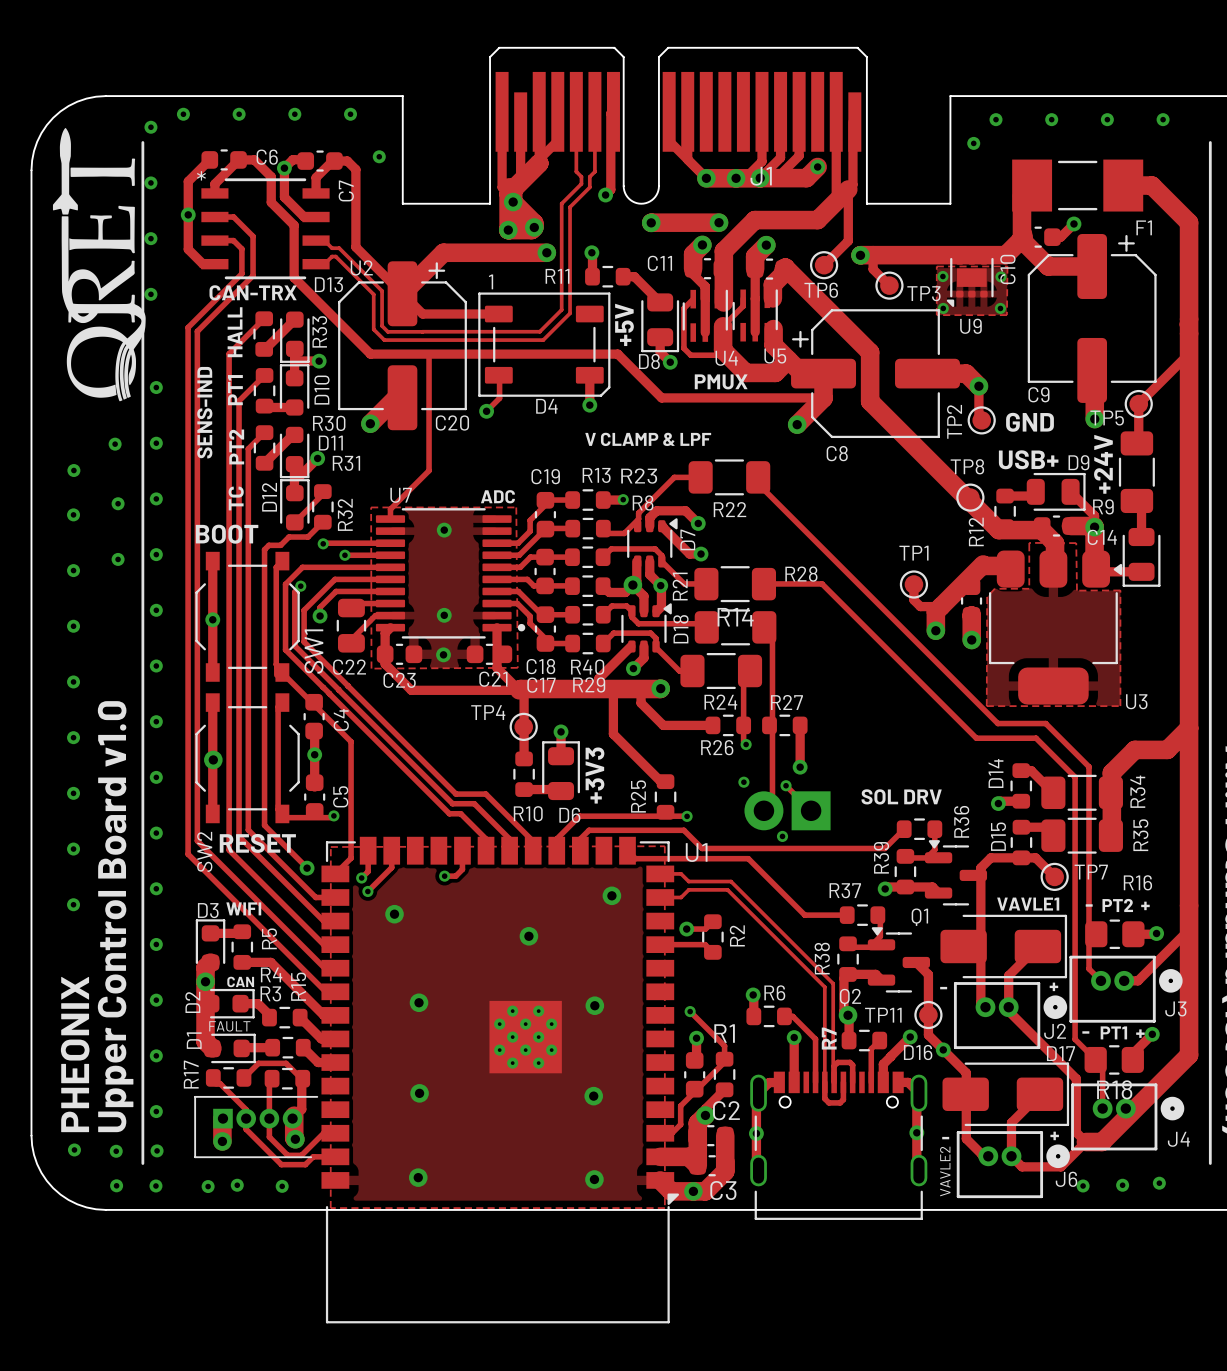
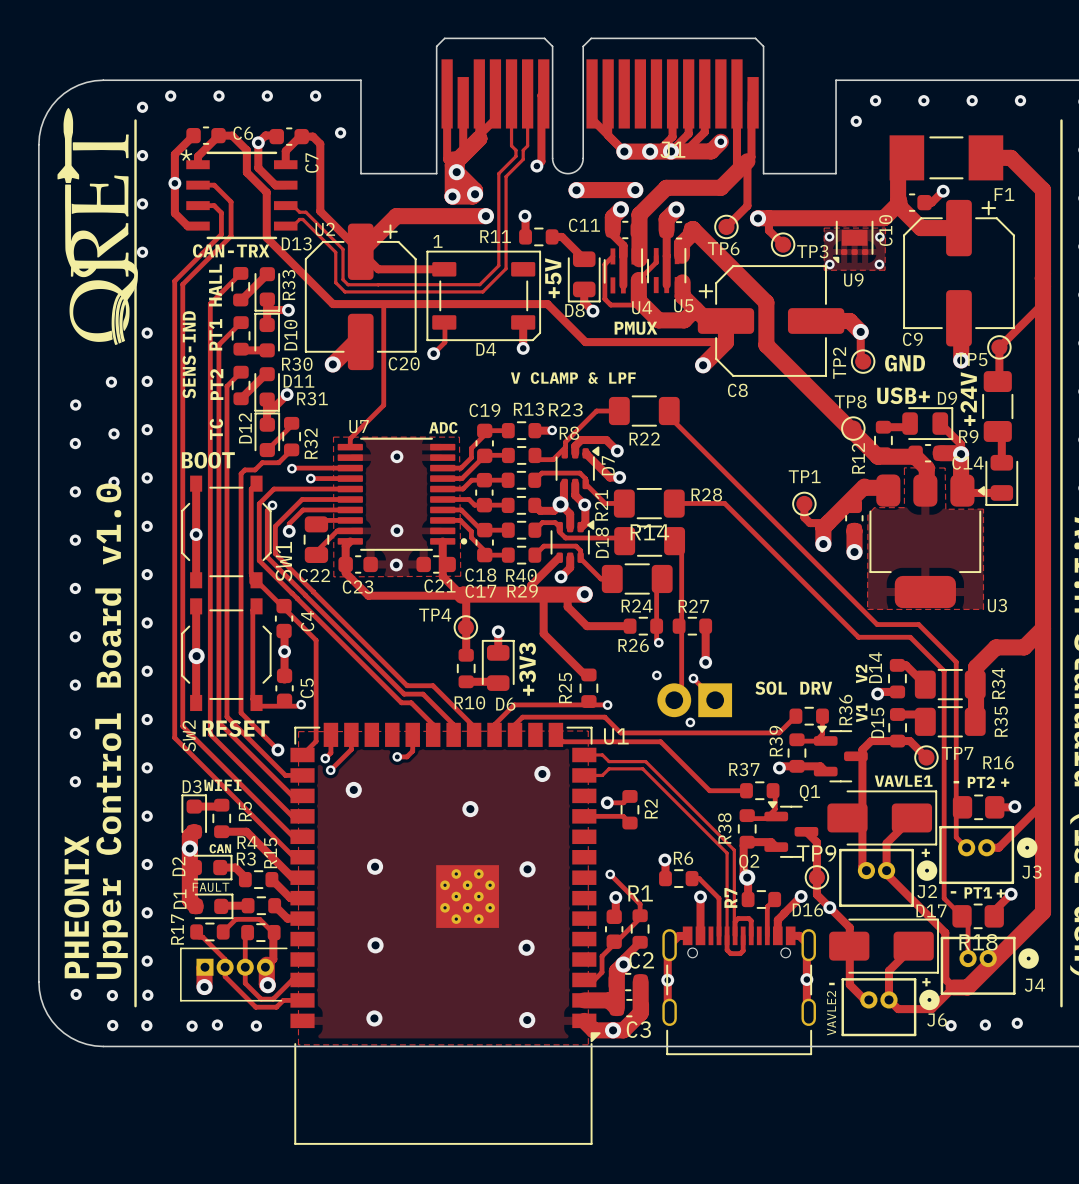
text: none -> V2 (861, 673)
text: none -> V1 (861, 712)
TP11 name: TP11 (883, 1015) -> TP9 (816, 853)

